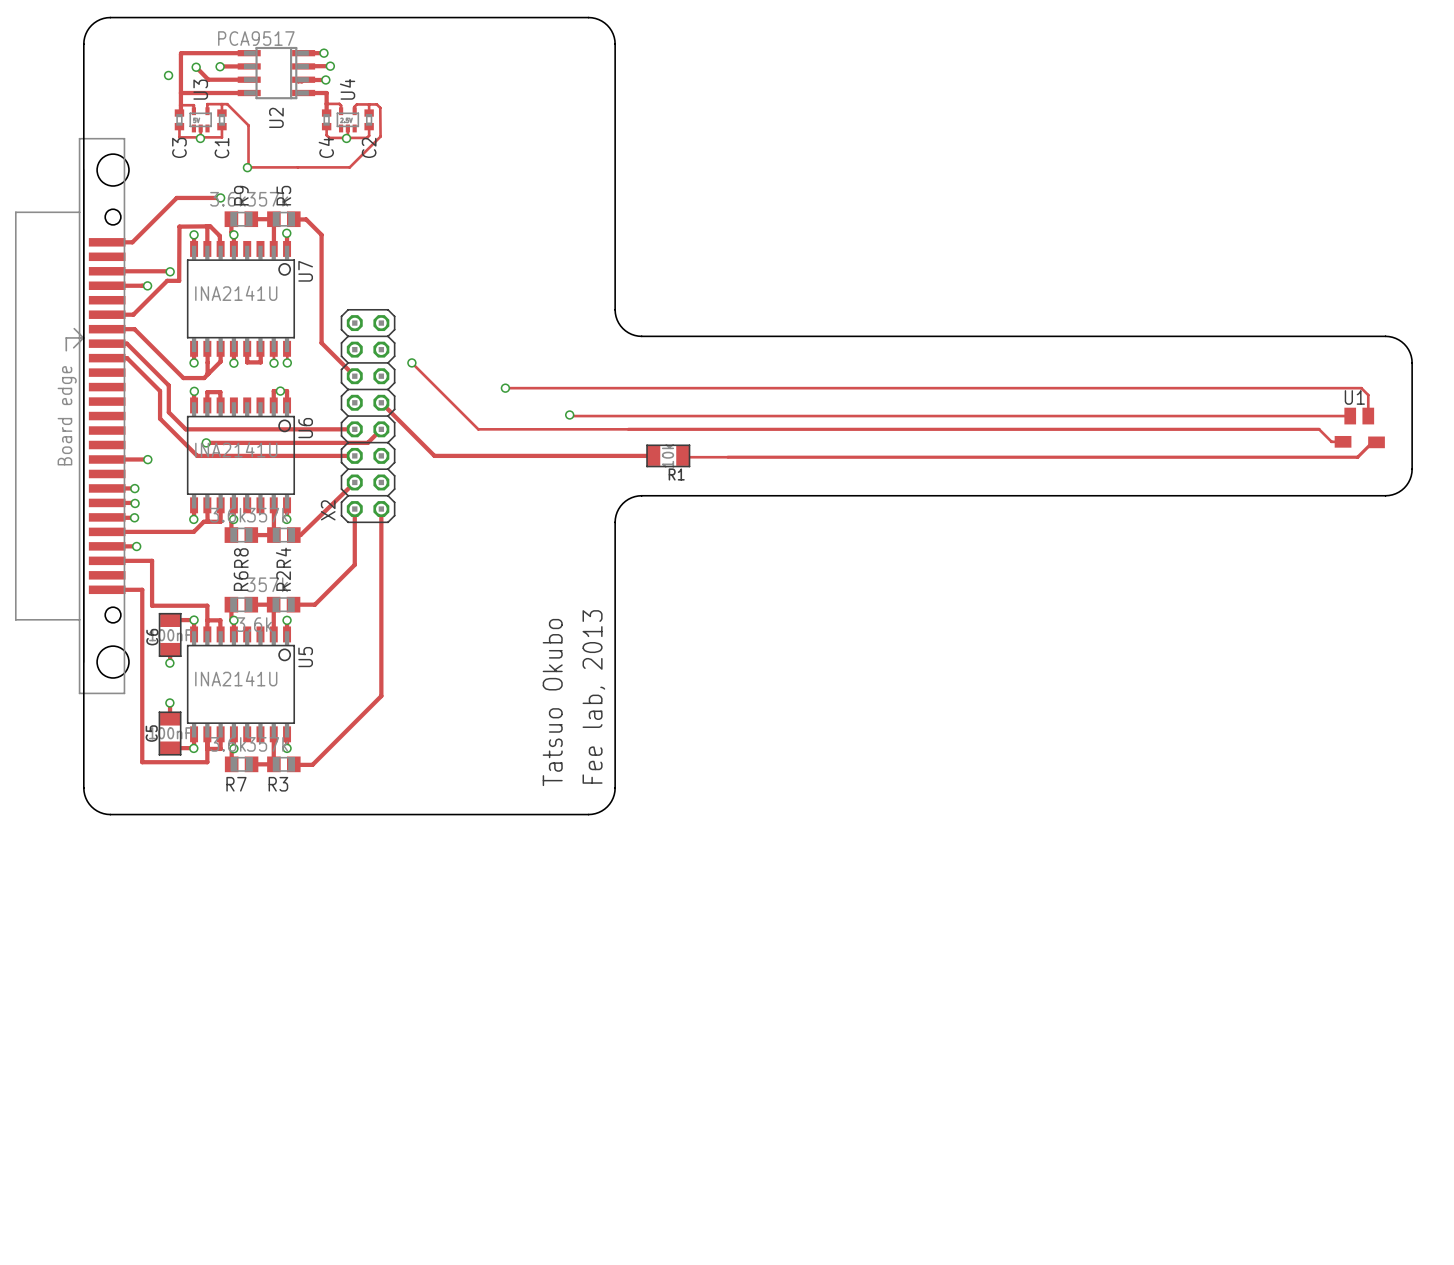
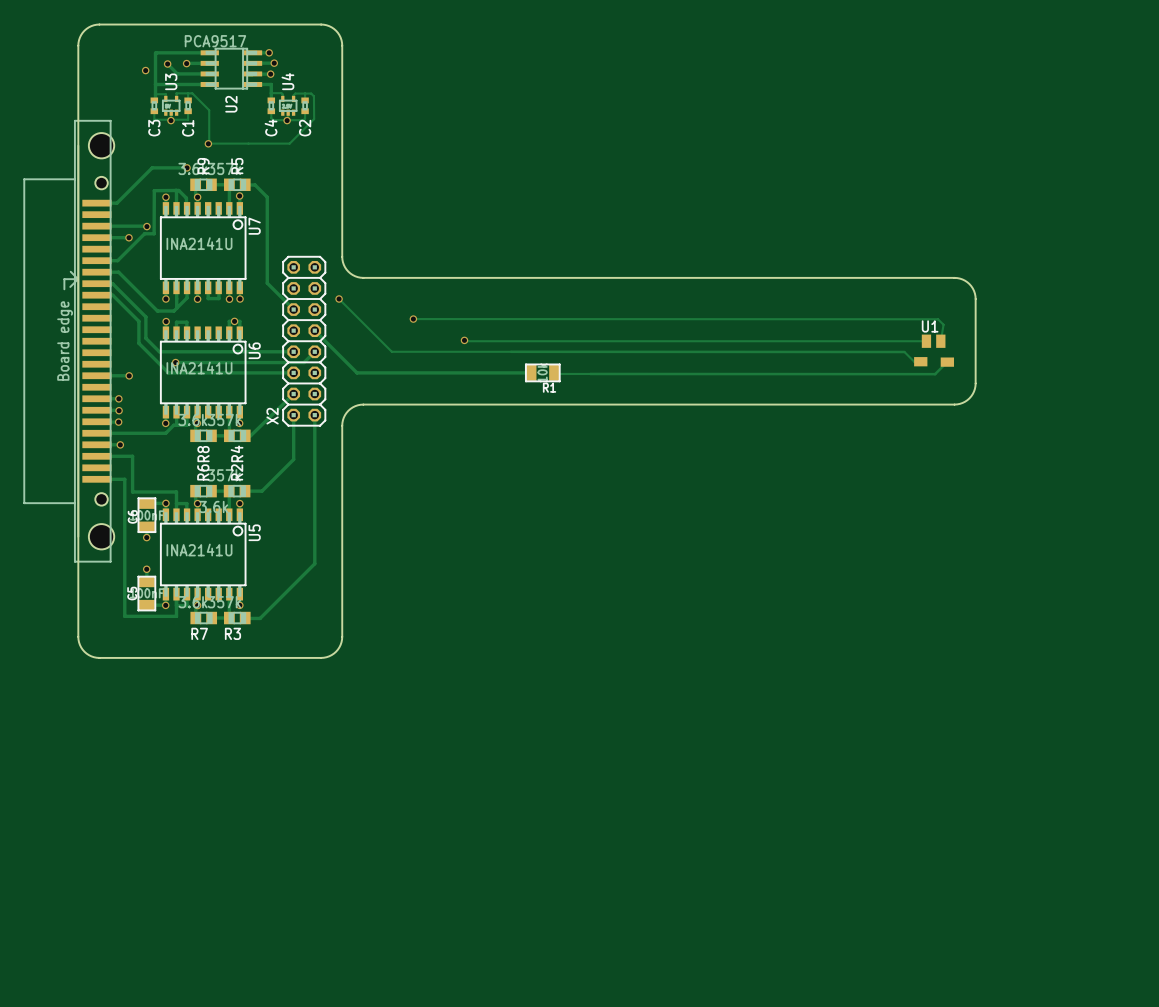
board edge: (389, 17) (588, 17) (598, 19) (609, 27) (615, 44) (615, 313) (622, 328) (631, 334) (641, 336) -> (321, 24) (329, 26) (336, 30) (342, 42) (342, 256) (346, 269) (355, 276) (363, 277) (521, 277)
board edge: (1186, 336) (1389, 336) (1404, 344) (1410, 352) (1412, 362) (1411, 472) (1406, 485) (1398, 492) (1385, 495) (1186, 495) -> (954, 277) (962, 279) (969, 284) (974, 290) (975, 299) (974, 388) (967, 400) (954, 404)
track: (505, 388) (1361, 388) (1368, 395) (1368, 416) -> (413, 319) (938, 319) (943, 324) (940, 341)
track: (1150, 416) (1350, 416) -> none
U1 position: (1359, 427) -> (934, 350)
track: (628, 429) (1319, 429) (1331, 441) (1343, 441) -> (511, 351) (904, 352) (914, 361) (920, 361)
track: (1376, 442) (1372, 442) (1357, 457) (728, 457) -> (947, 362) (949, 362) (946, 362) (935, 374) (590, 373)
board edge: (641, 495) (631, 497) (622, 503) (615, 518) (615, 787) (609, 804) (598, 812) (588, 814) (389, 814) -> (521, 404) (363, 404) (355, 406) (346, 412) (342, 425) (342, 639) (336, 651) (329, 656) (321, 657)
text: Fee lab, 2013 (593, 696) -> none
text: Tatsuo Okubo (552, 702) -> none

